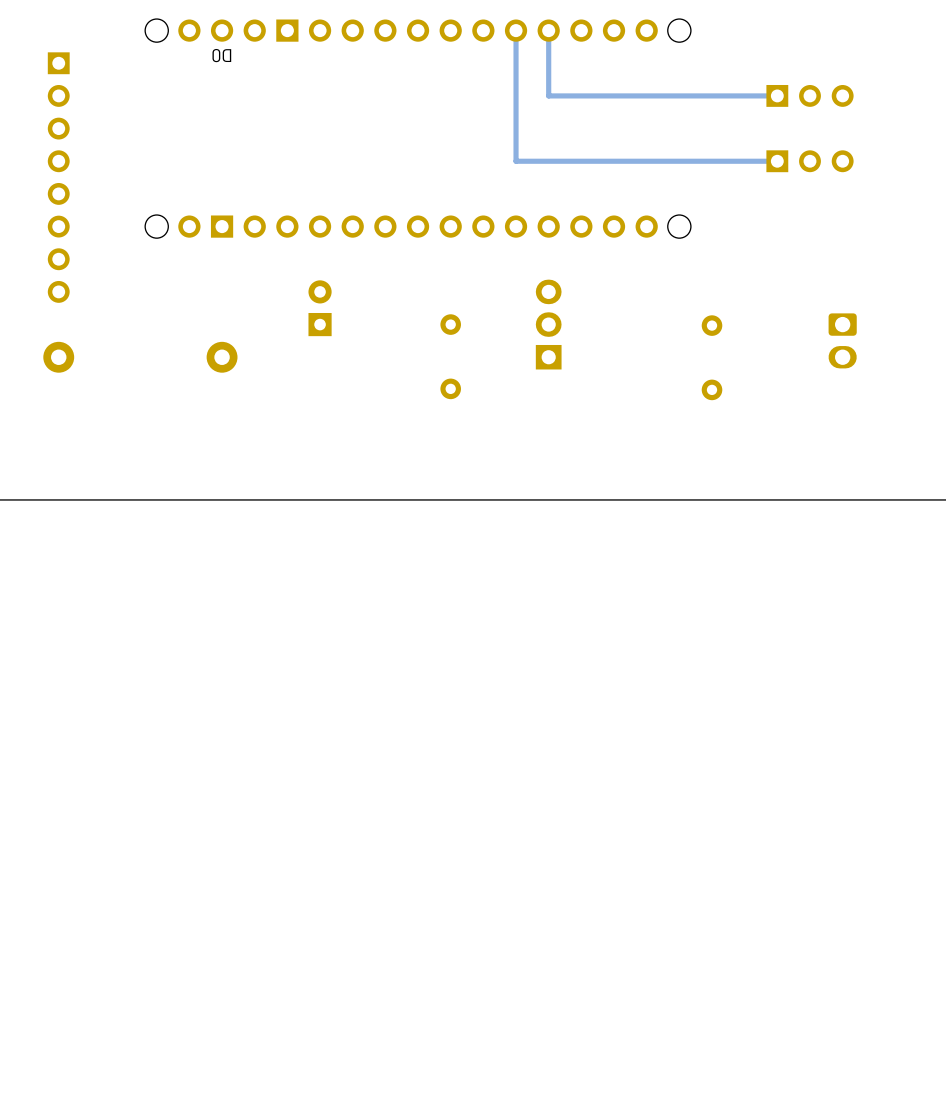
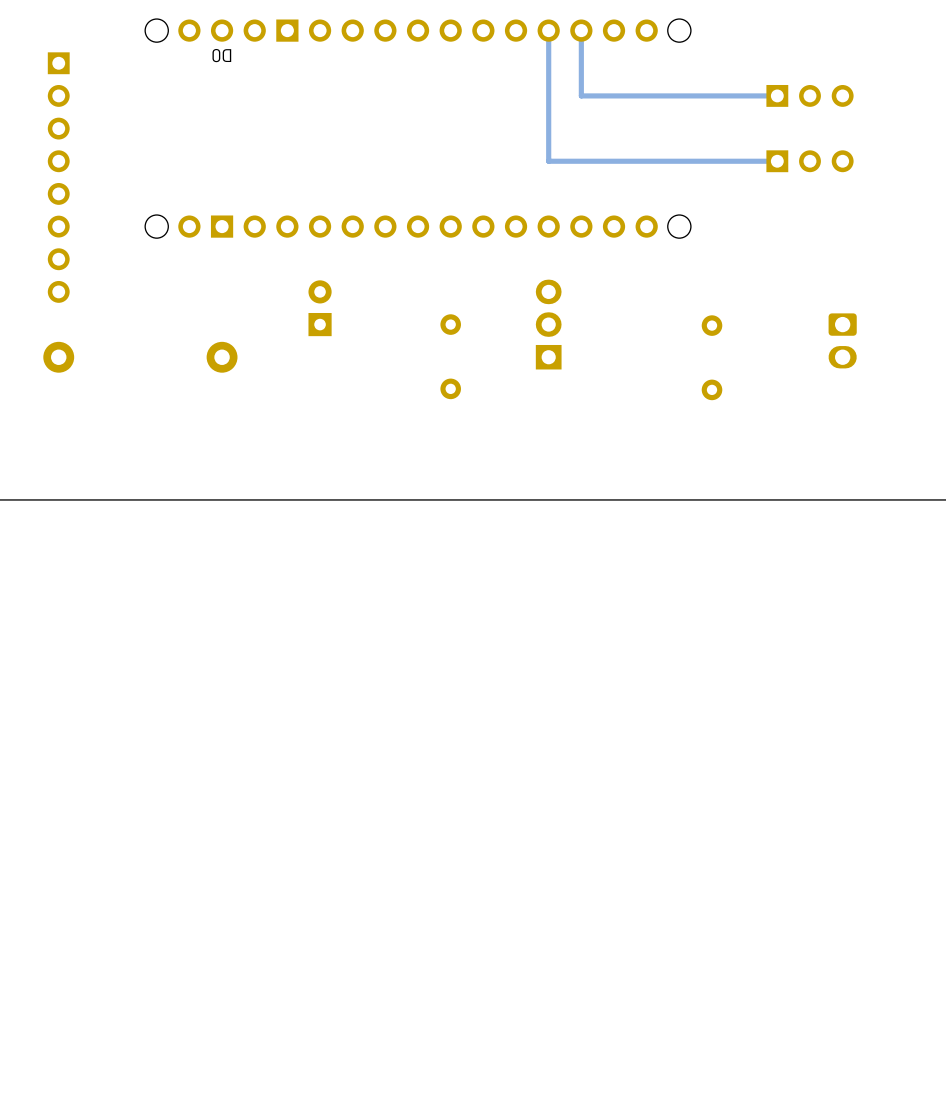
track: (516, 30) (516, 161) (548, 161) -> (548, 95) (548, 161)
track: (581, 95) (548, 95) -> (581, 95) (581, 30)

